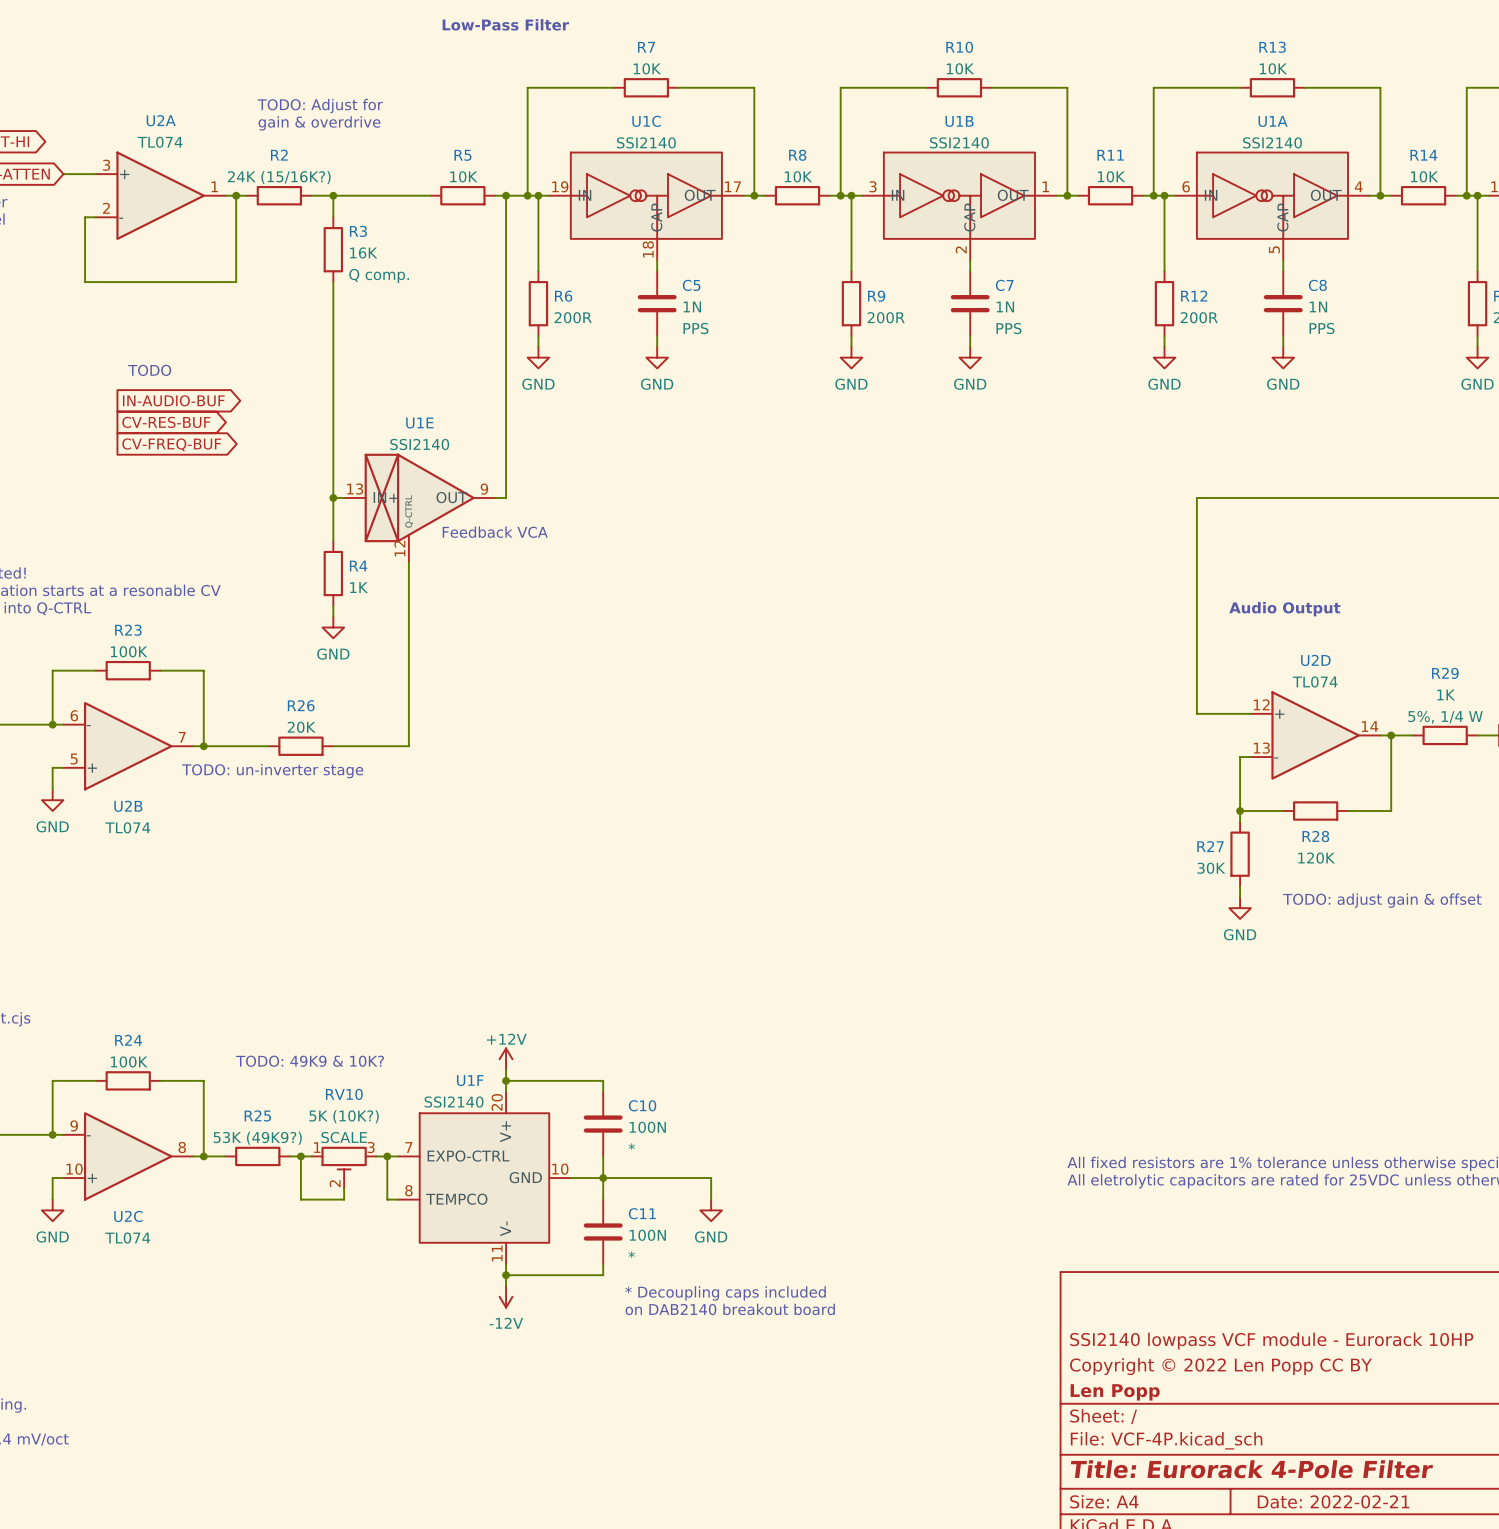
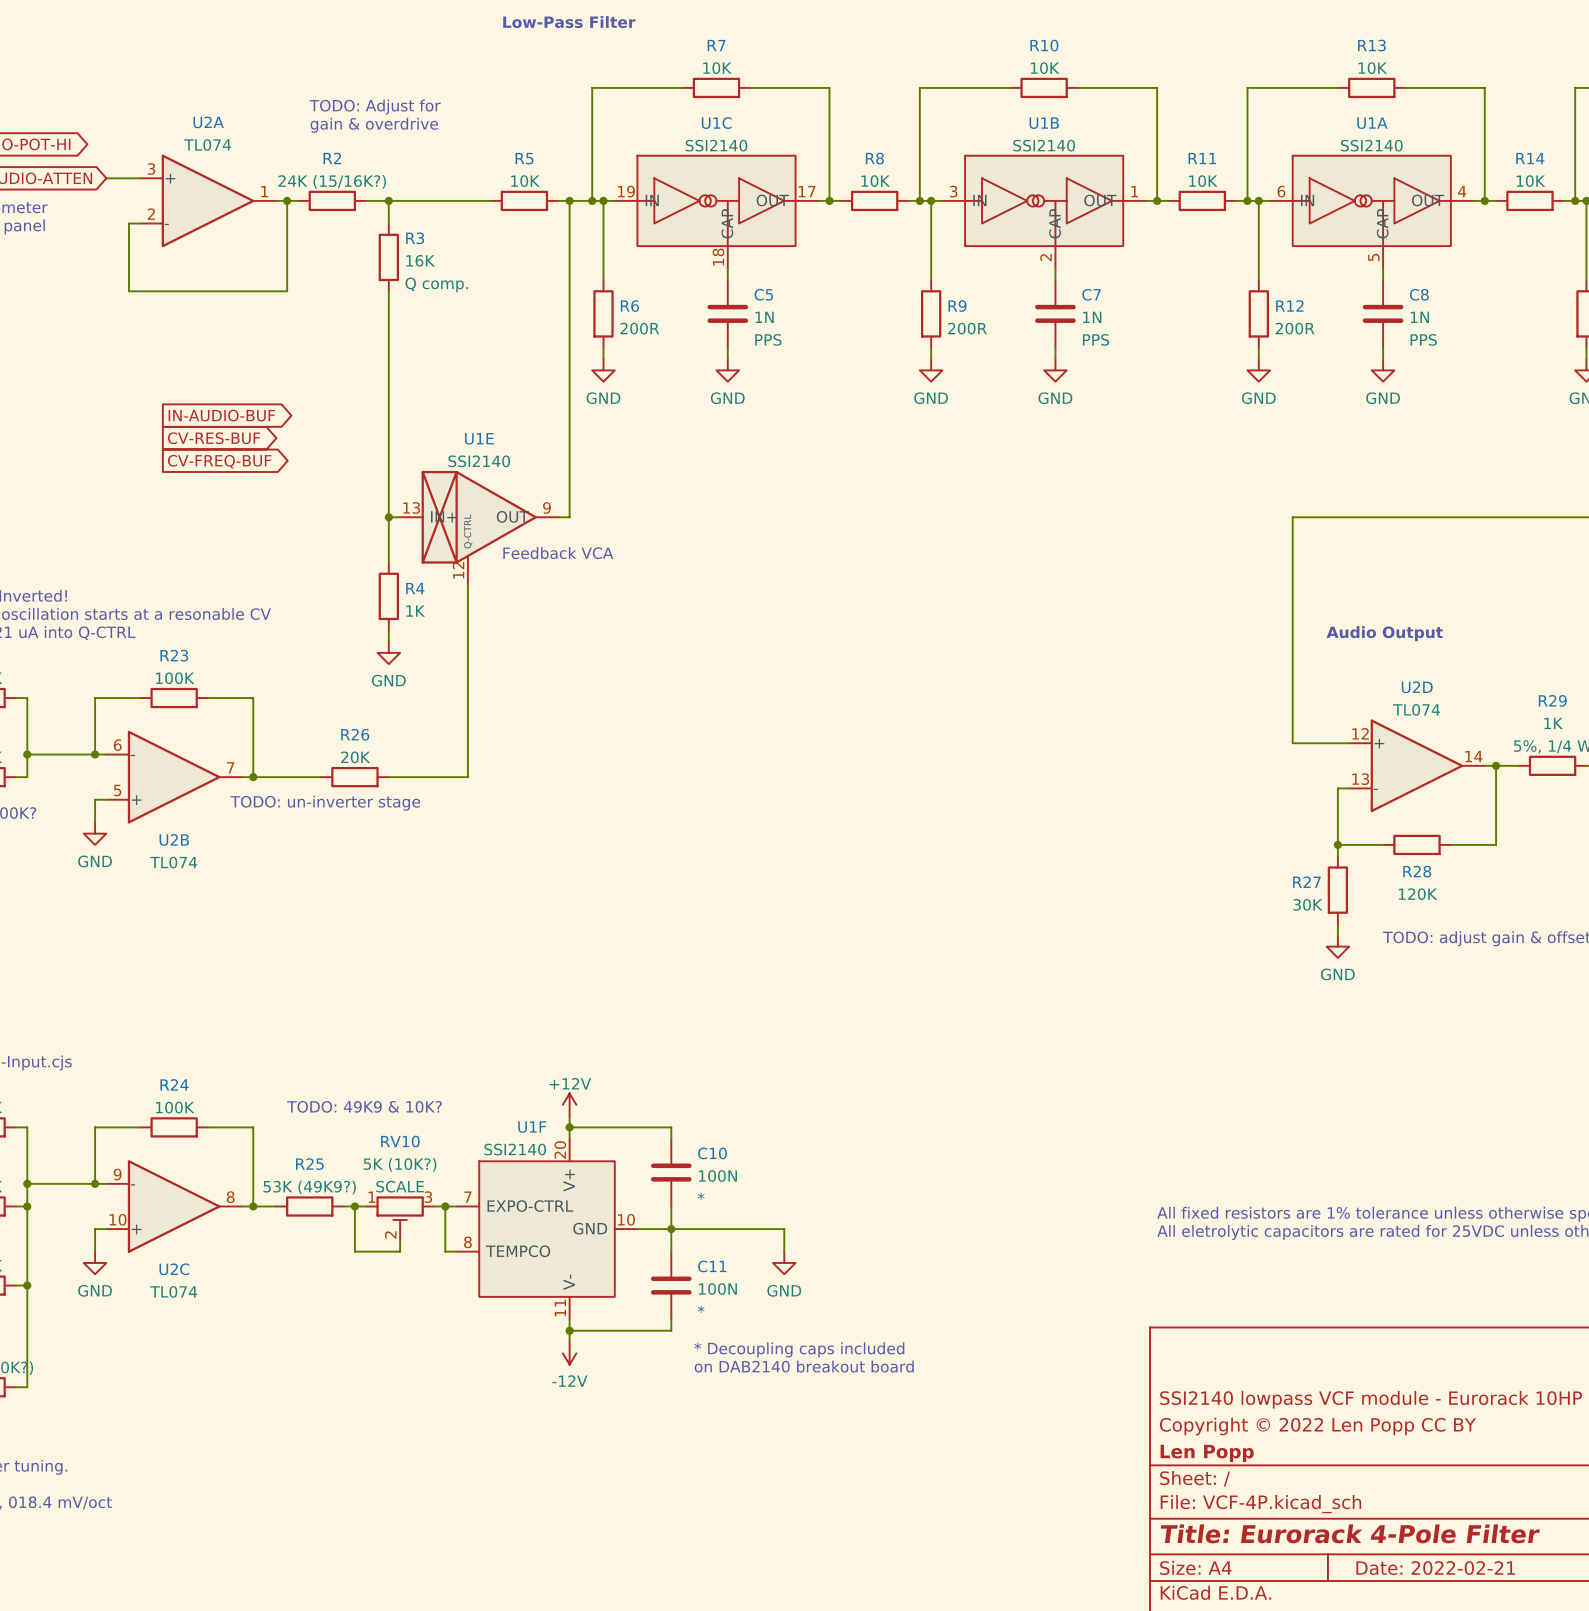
text: TODO (149, 370) -> none

